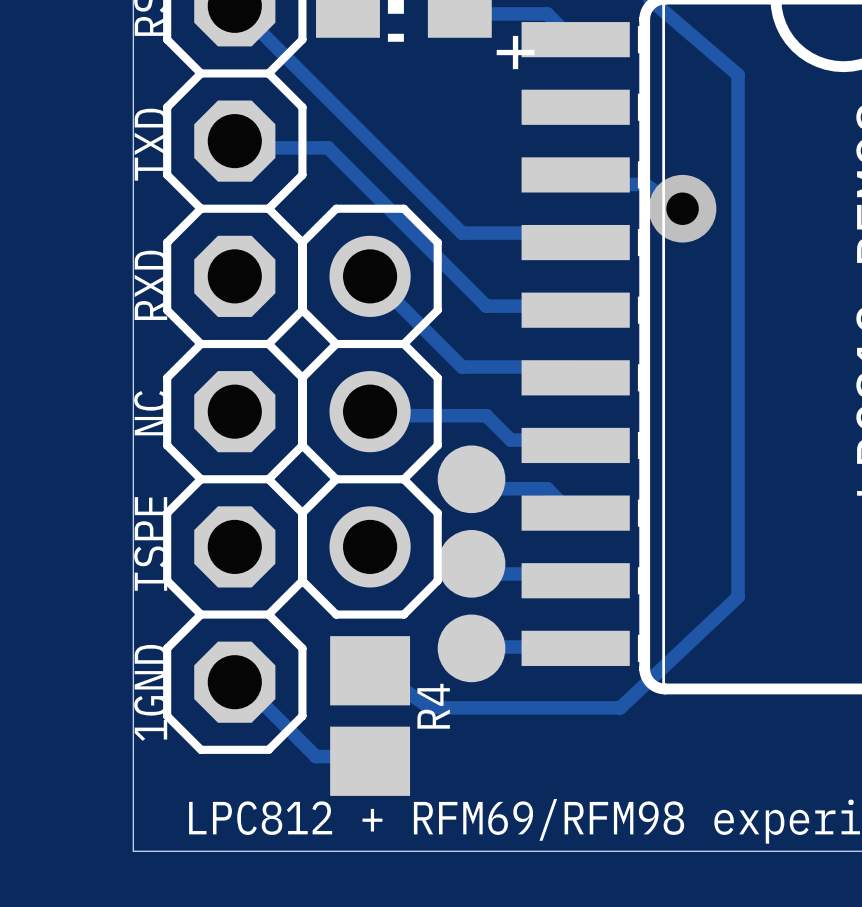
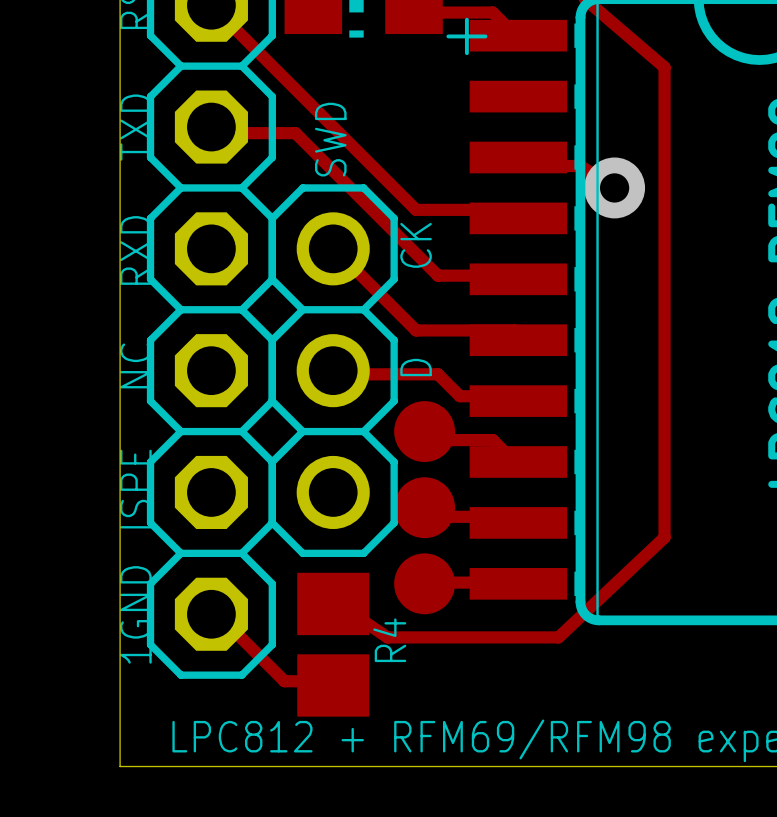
text: none -> SWD (330, 139)
text: none -> CK (416, 245)
text: none -> D (416, 367)

